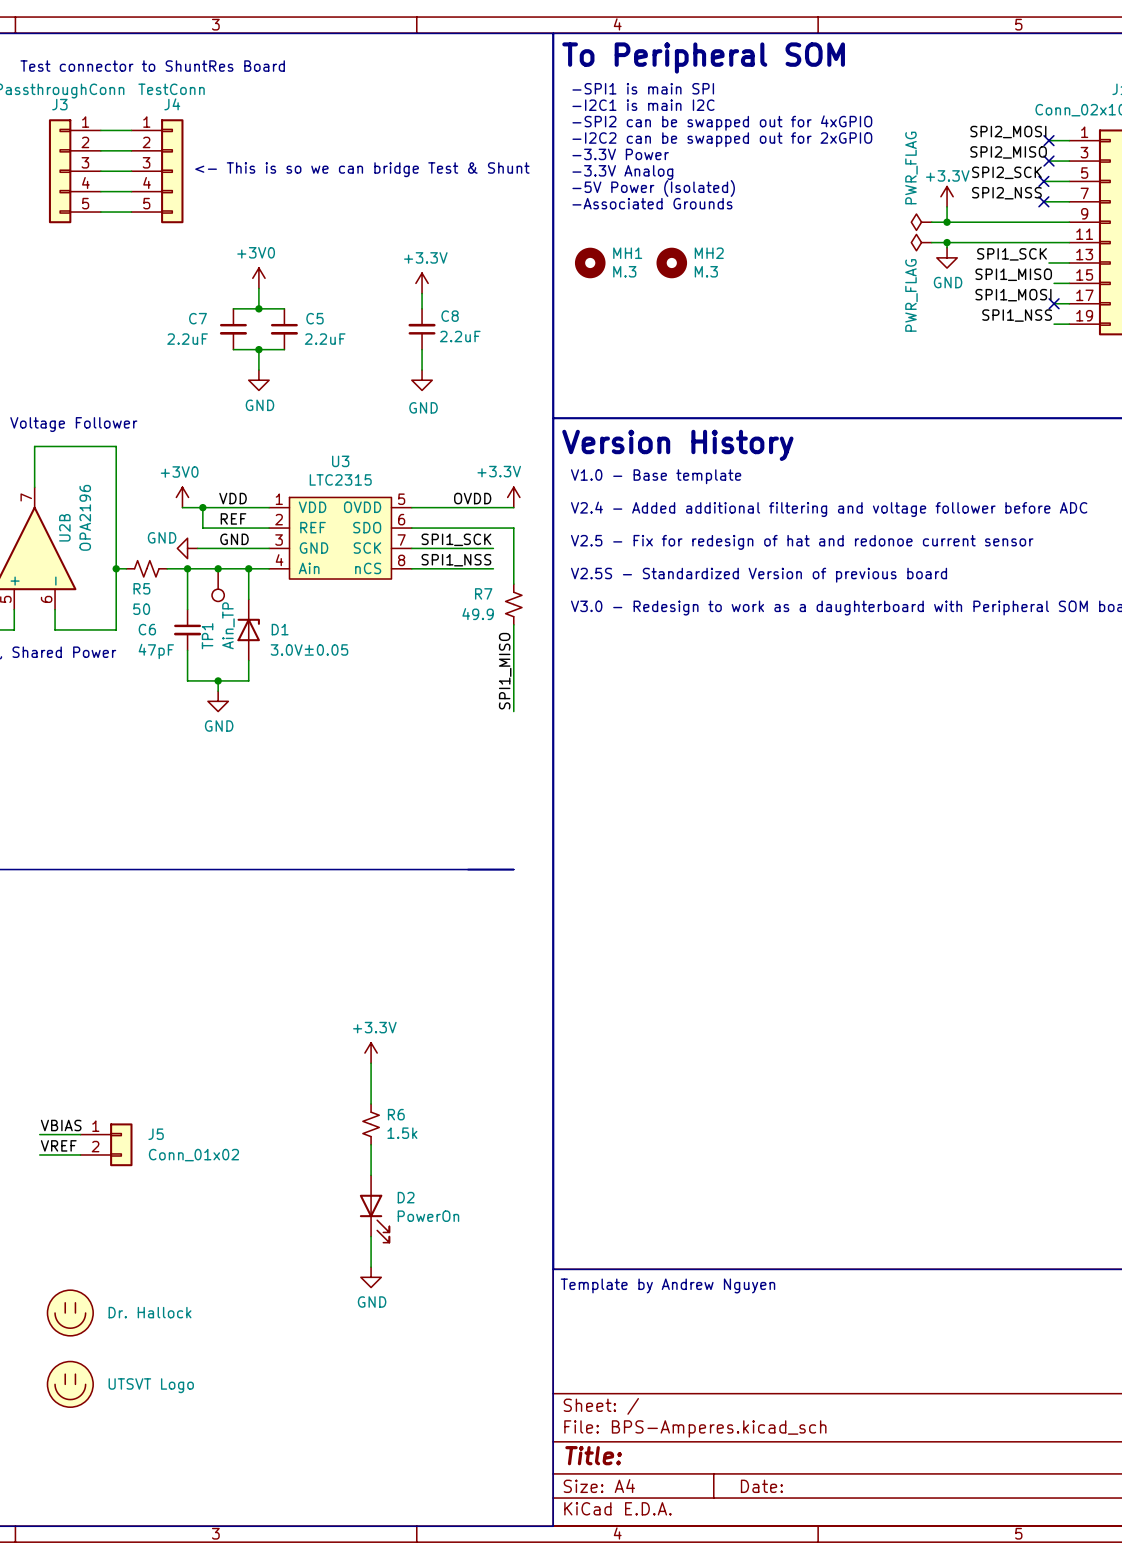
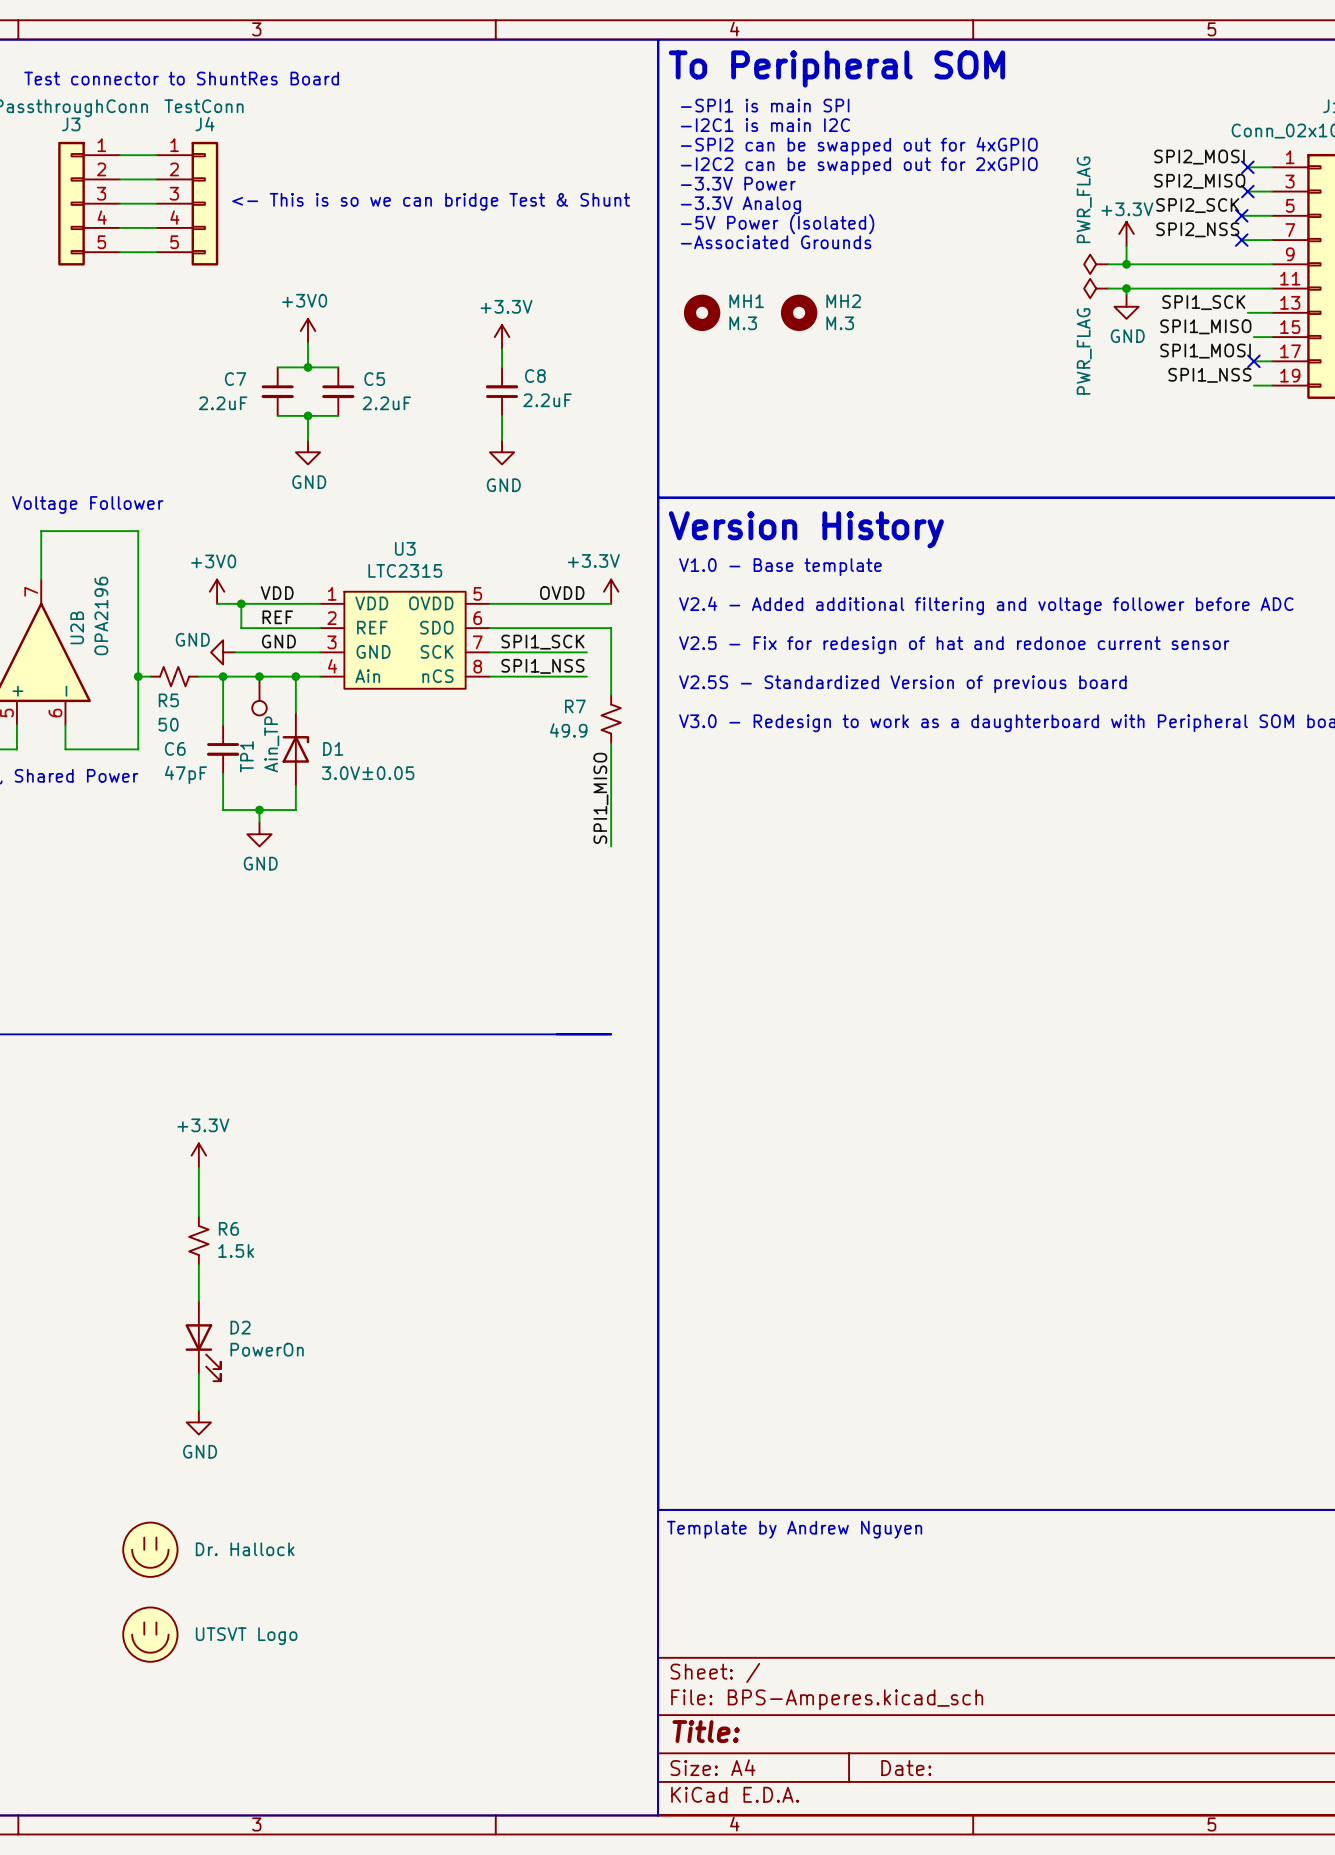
power symbol: none -> +3.3V (198, 1155)
wire: none -> (198, 1167) (198, 1216)
power symbol: +3.3V (371, 1053) -> none
wire: none -> (198, 1264) (198, 1301)
wire: (371, 1063) (371, 1104) -> none
R6 position: (371, 1124) -> (198, 1240)
label: VBIAS (61, 1125) -> none
wire: (39, 1134) (80, 1134) -> none
J5: Conn_01x02 (106, 1144) -> none
wire: (371, 1144) (371, 1175) -> none
label: VREF (58, 1145) -> none
wire: (39, 1154) (80, 1154) -> none
wire: none -> (198, 1373) (198, 1410)
power symbol: none -> GND (198, 1422)
D2 position: (374, 1209) -> (203, 1341)
wire: (371, 1236) (371, 1267) -> none
power symbol: GND (371, 1277) -> none
part position: (70, 1313) -> (150, 1549)
part position: (70, 1384) -> (150, 1634)

